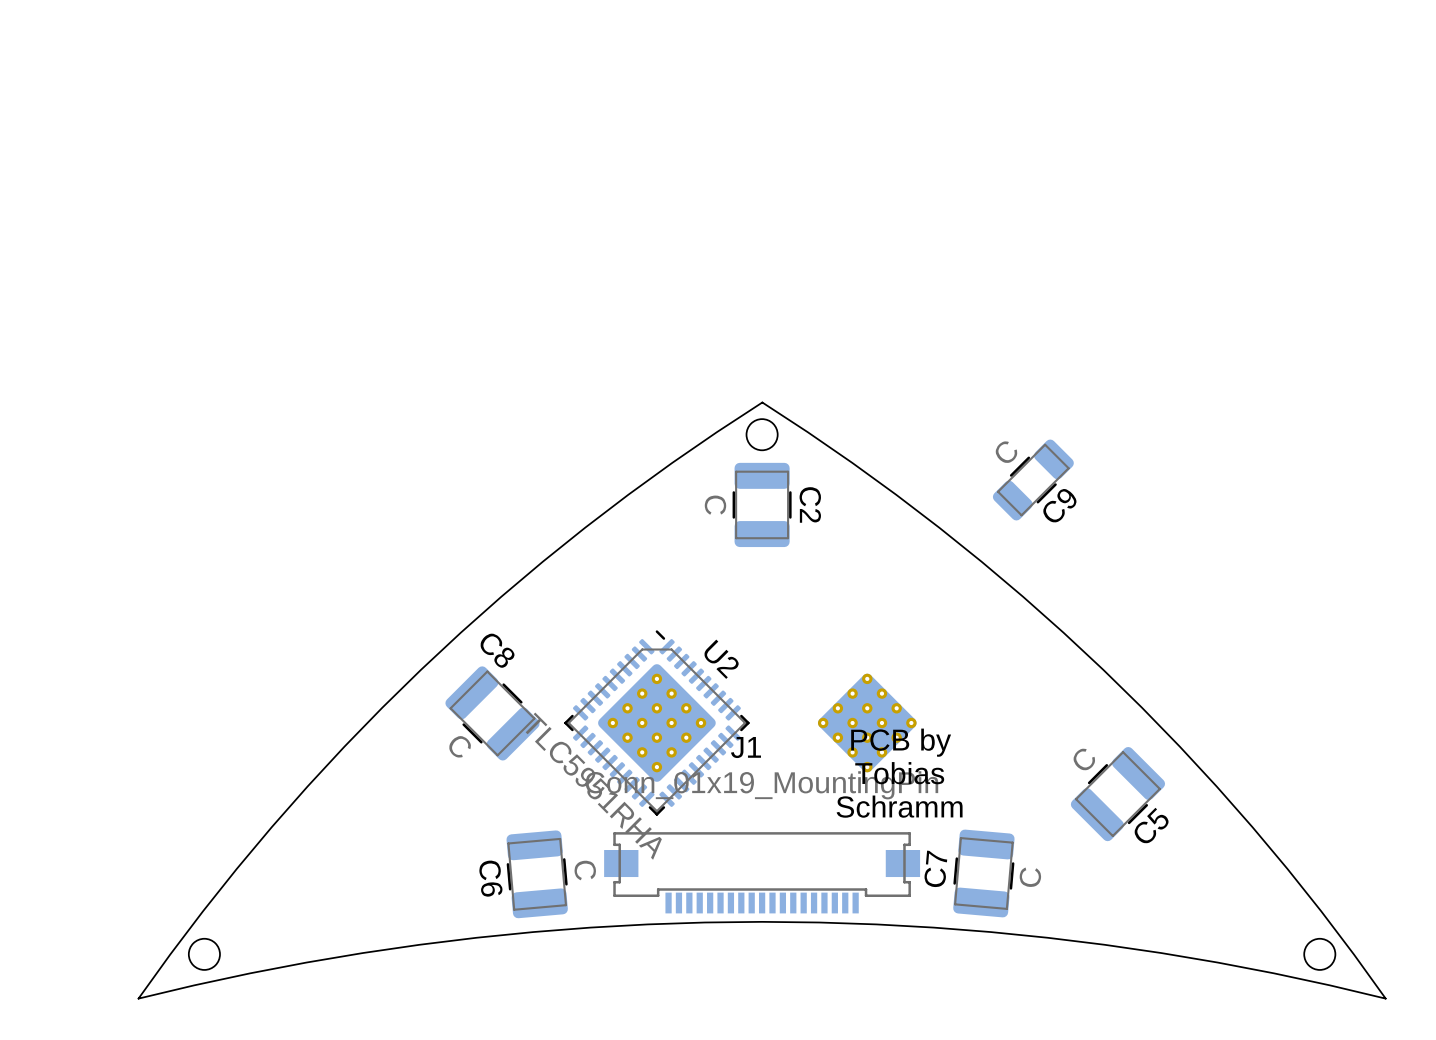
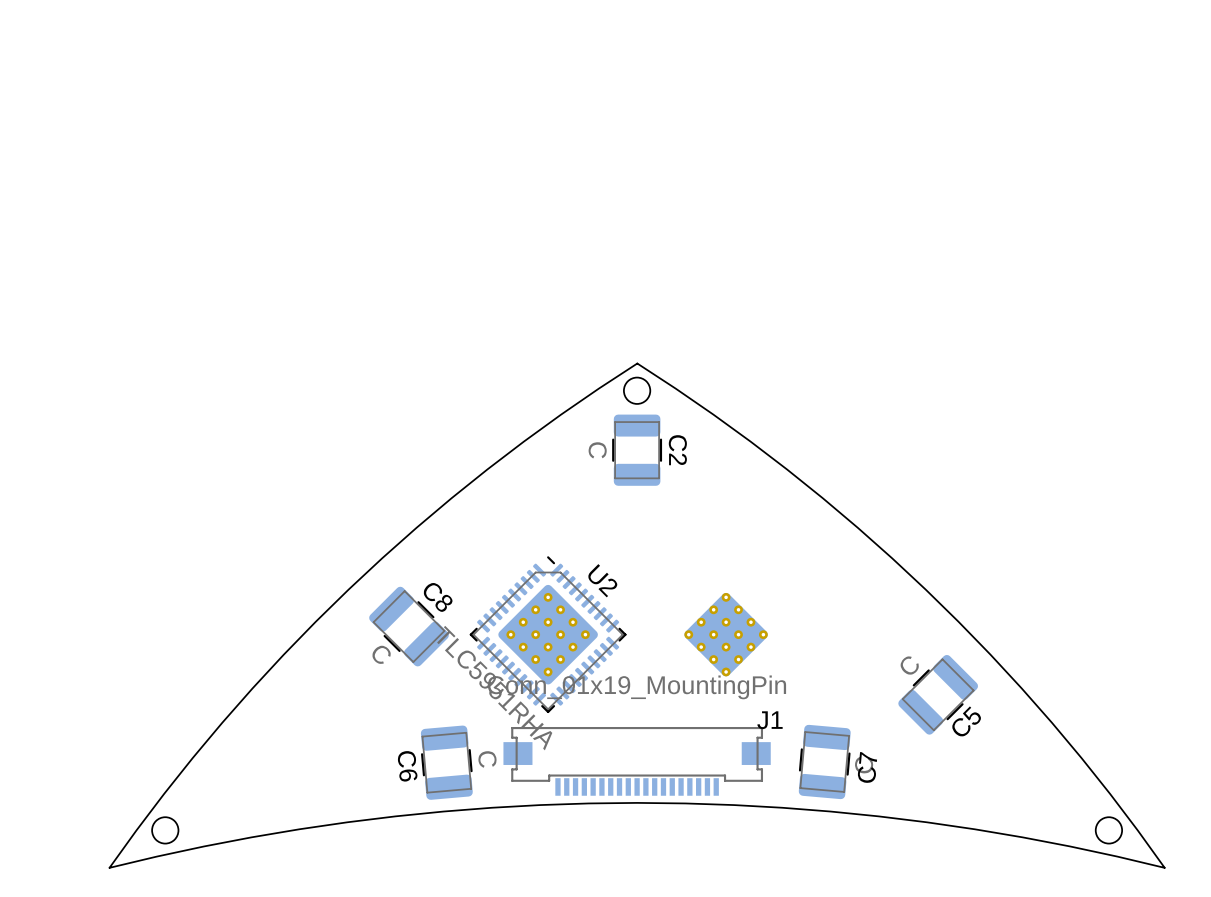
C9: C (1033, 480) -> none
C8 name position: C8 (497, 650) -> C8 (438, 597)
text: PCB by (901, 742) -> none
J1 name position: J1 (746, 747) -> J1 (769, 720)
text: Tobias (899, 773) -> none
text: Schramm (899, 806) -> none
C7 name position: C7 (935, 868) -> C7 (867, 767)

